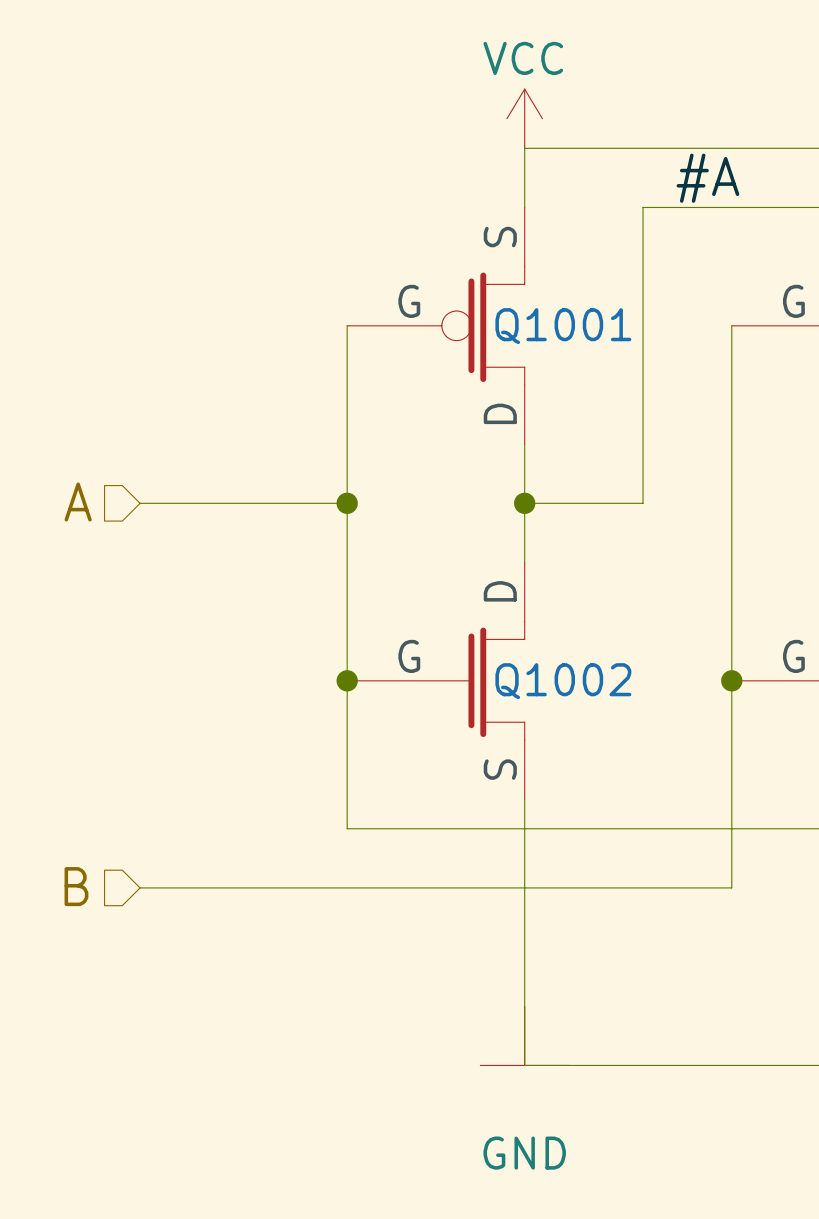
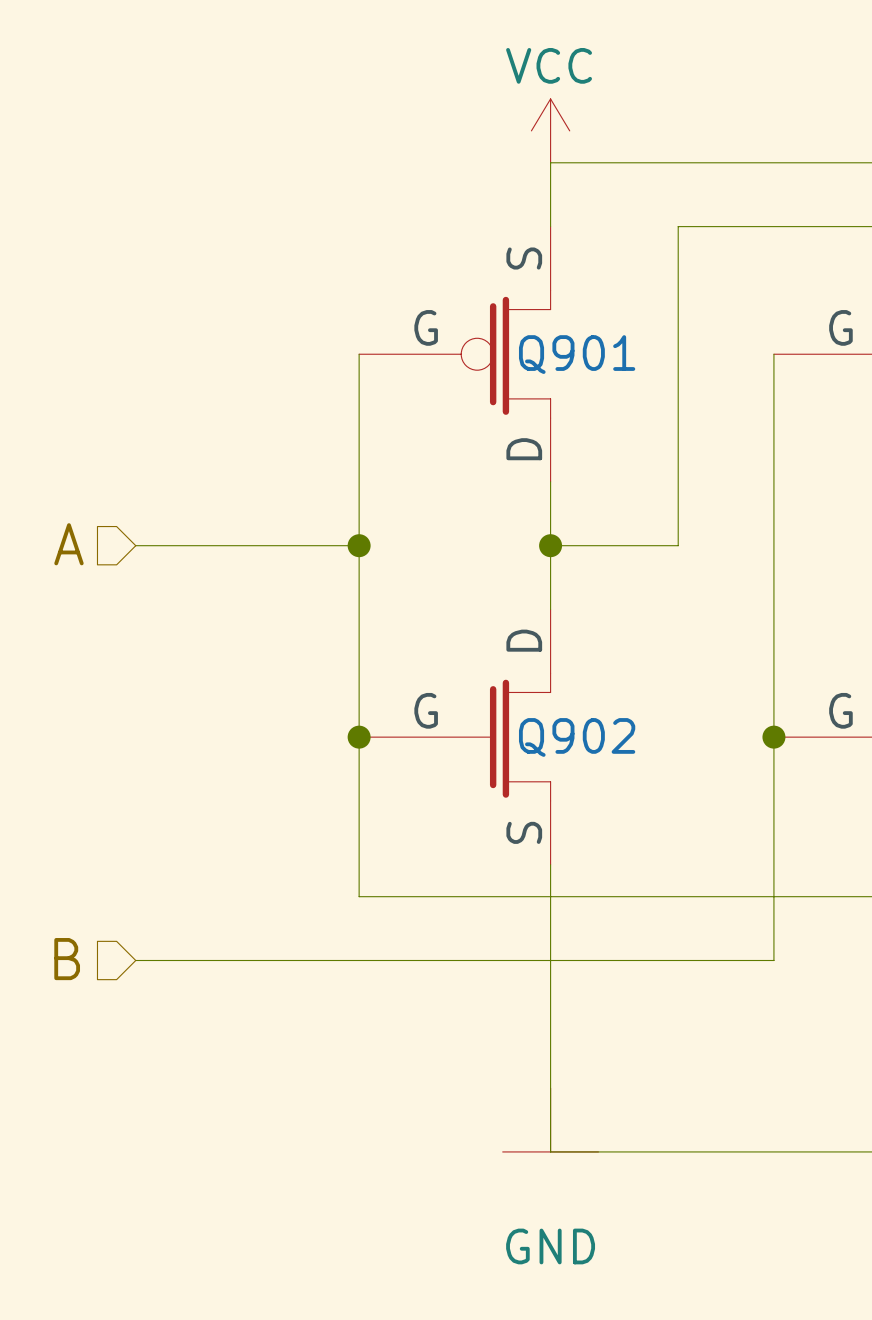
label: #A (707, 178) -> none
Q1001 name: Q1001 (563, 326) -> Q901 (577, 354)
Q1002 name: Q1002 (563, 681) -> Q902 (577, 737)

